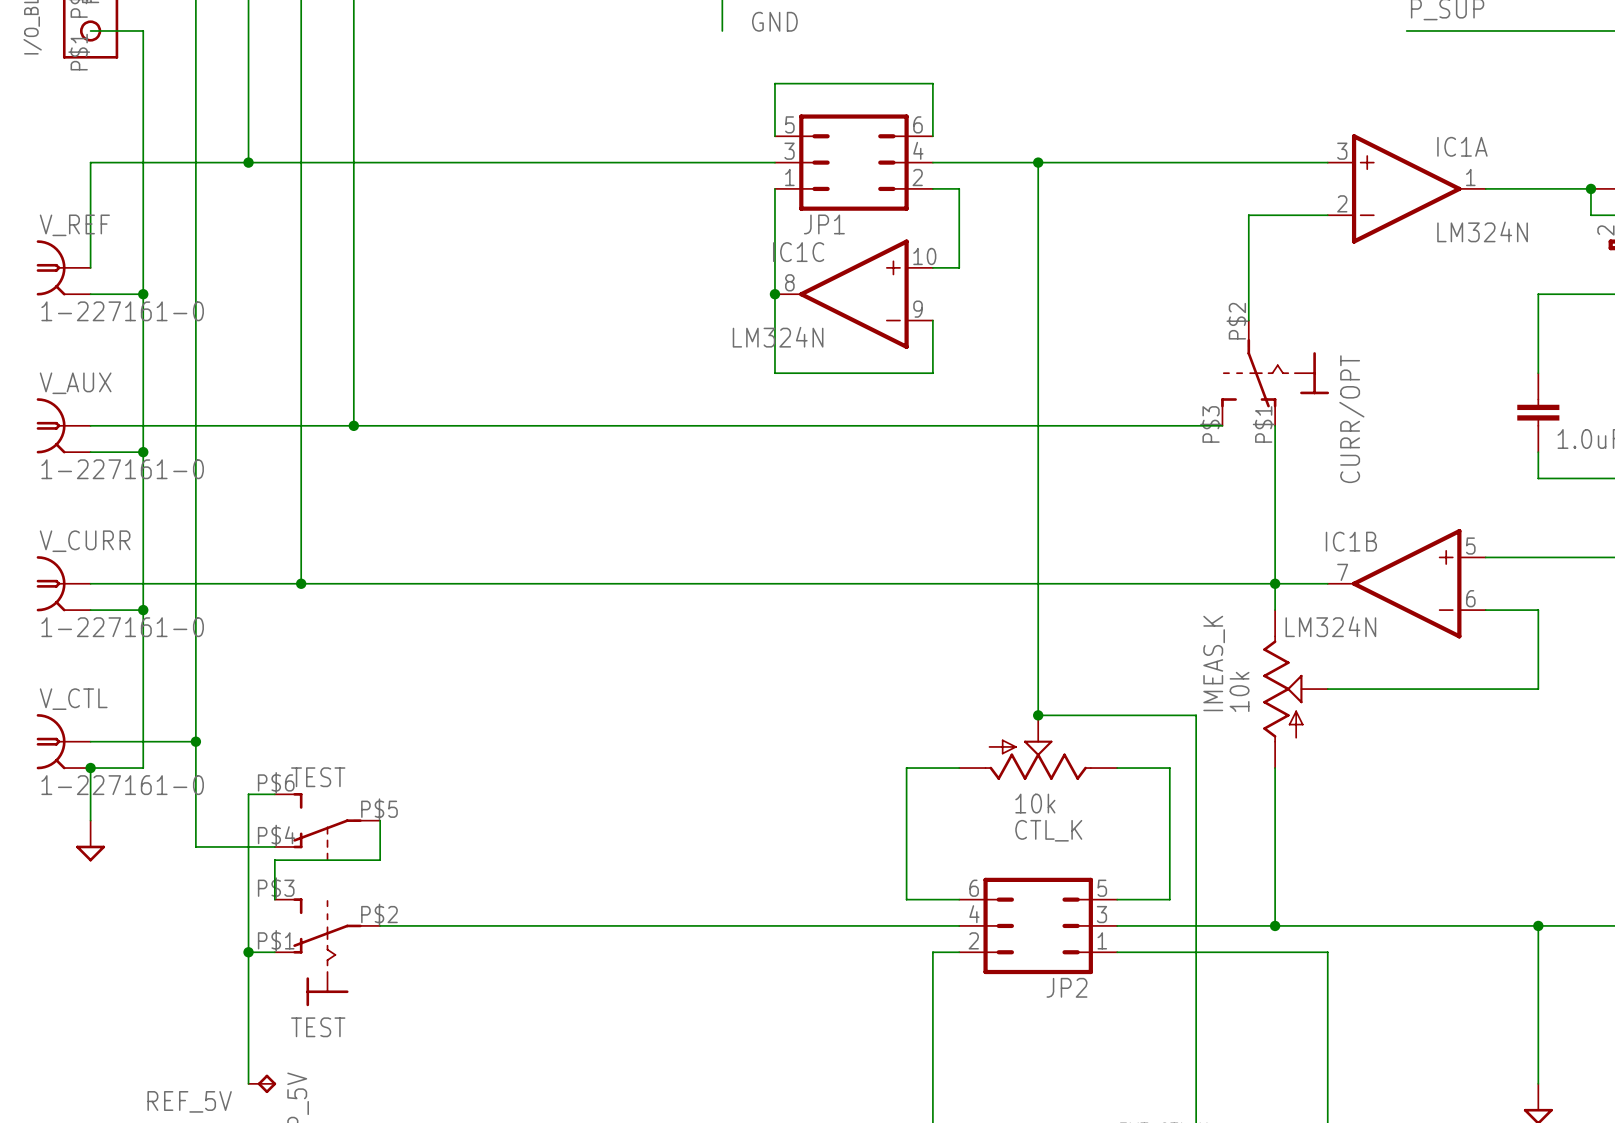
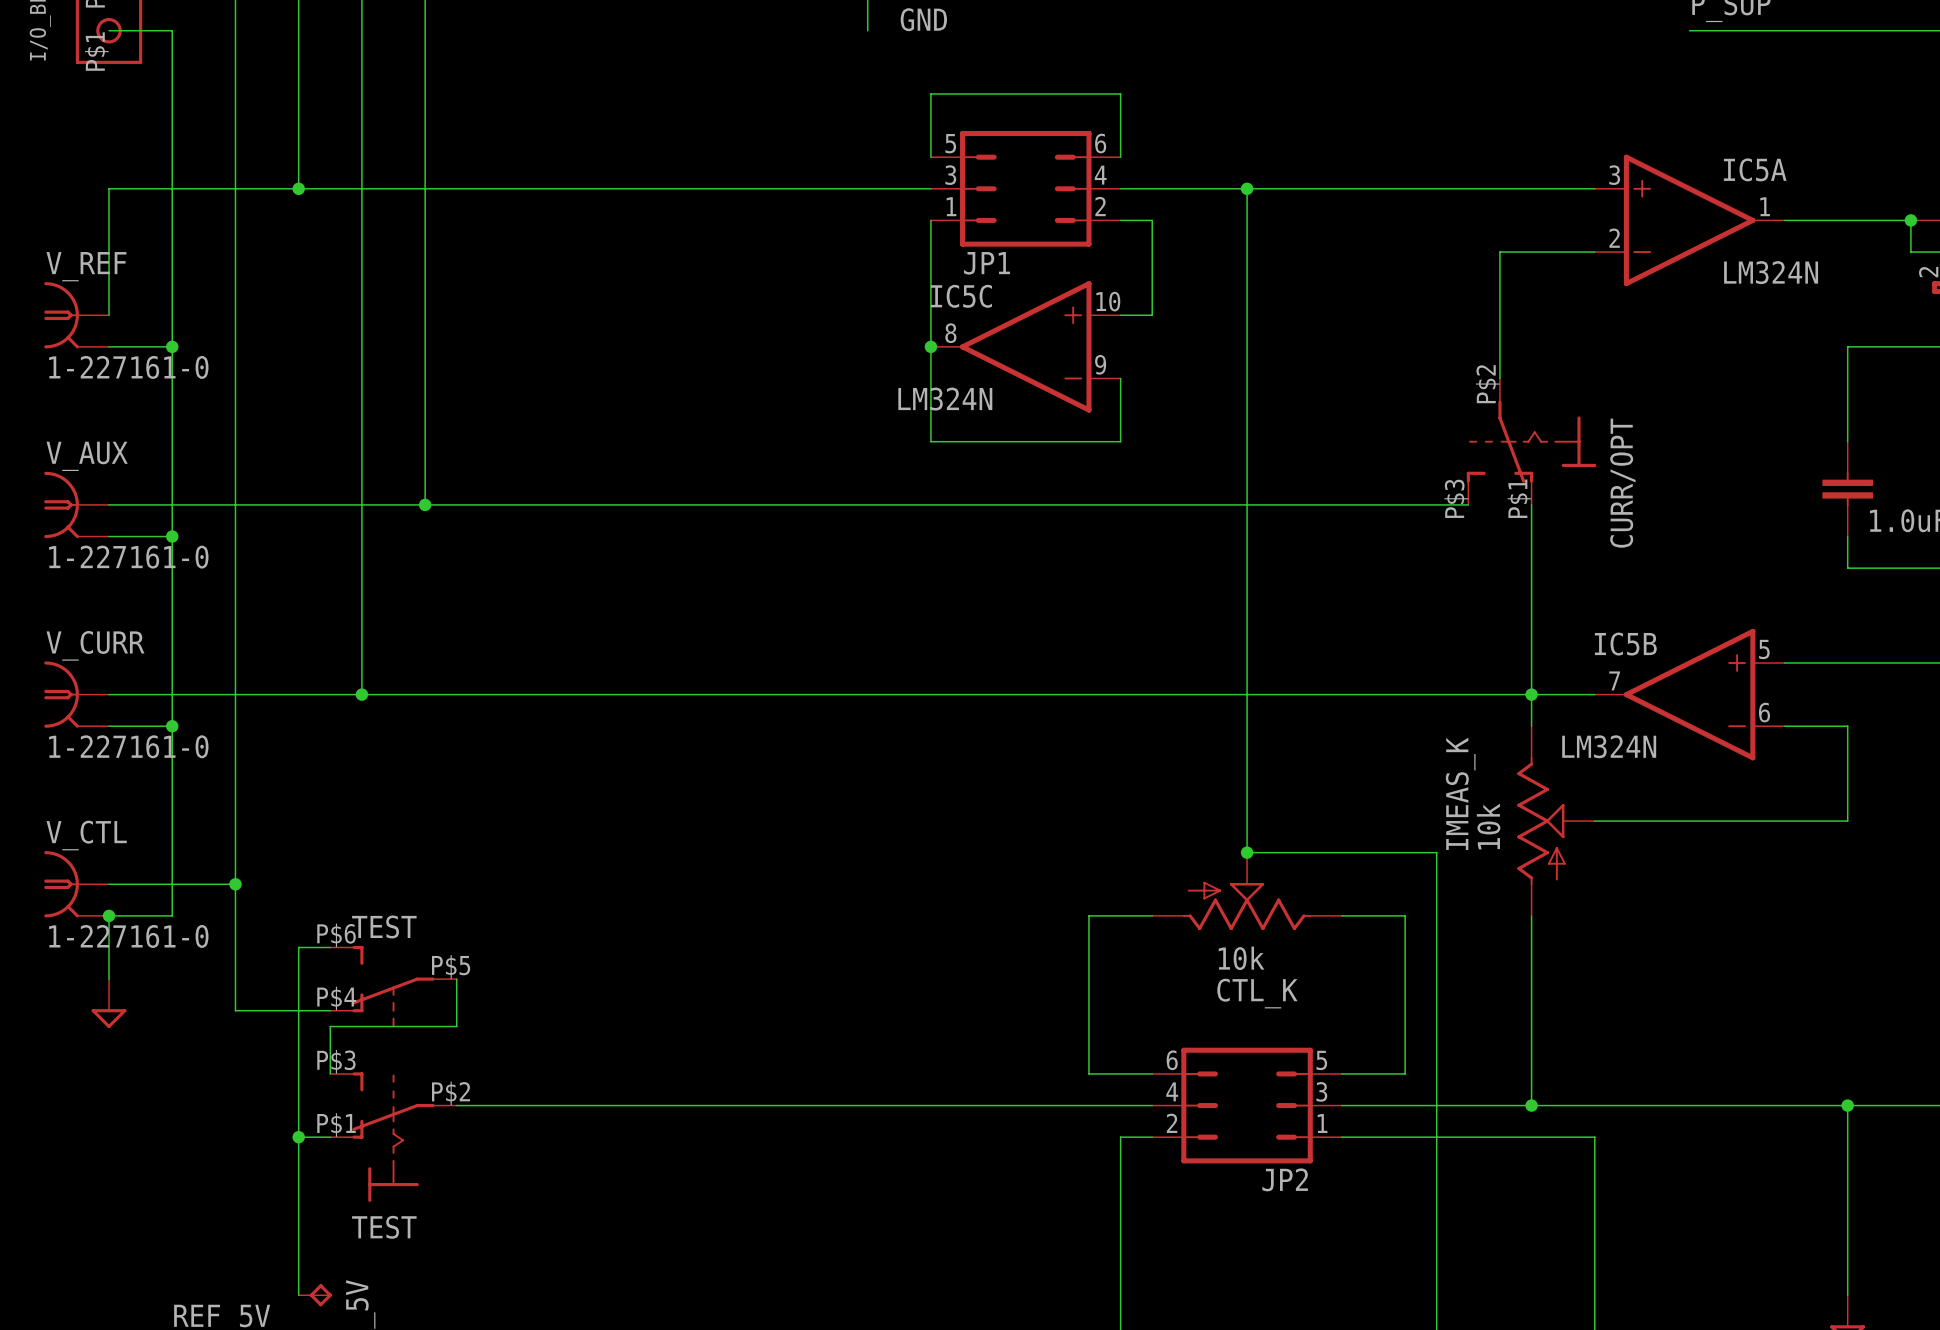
IC1A name: IC1A (1462, 146) -> IC5A (1755, 169)
IC1C name: IC1C (798, 252) -> IC5C (961, 296)
IC1B name: IC1B (1351, 541) -> IC5B (1625, 644)

